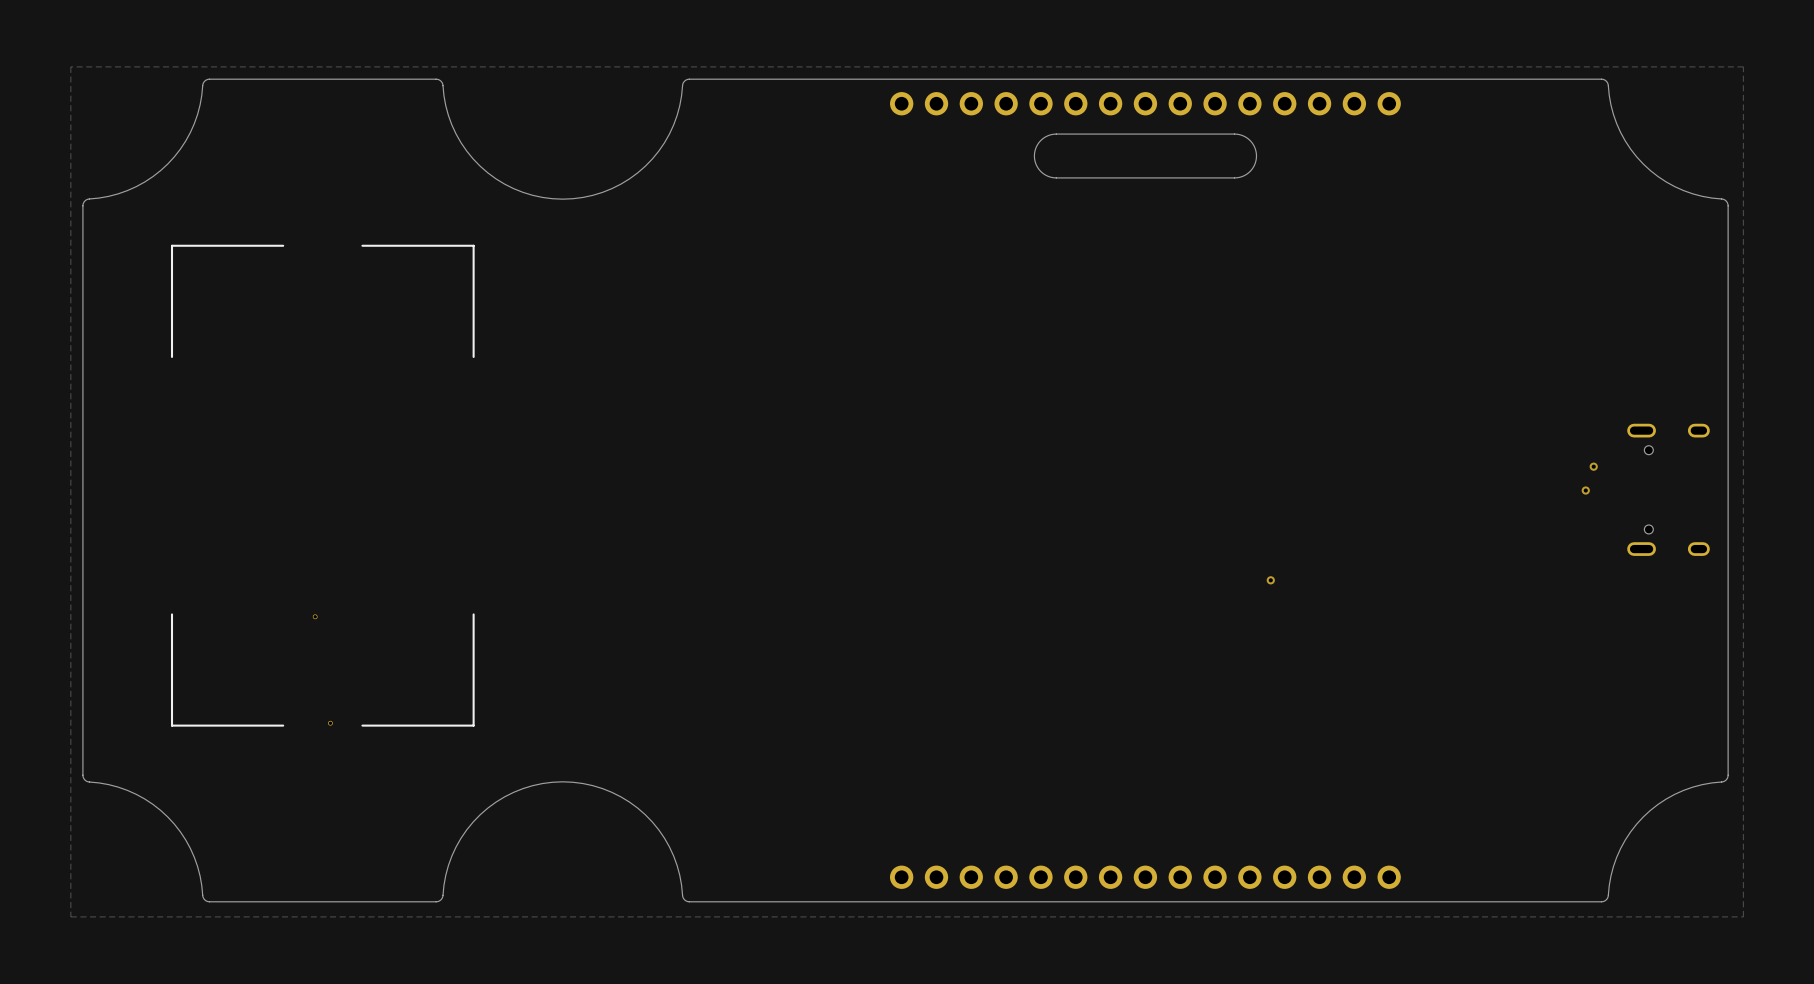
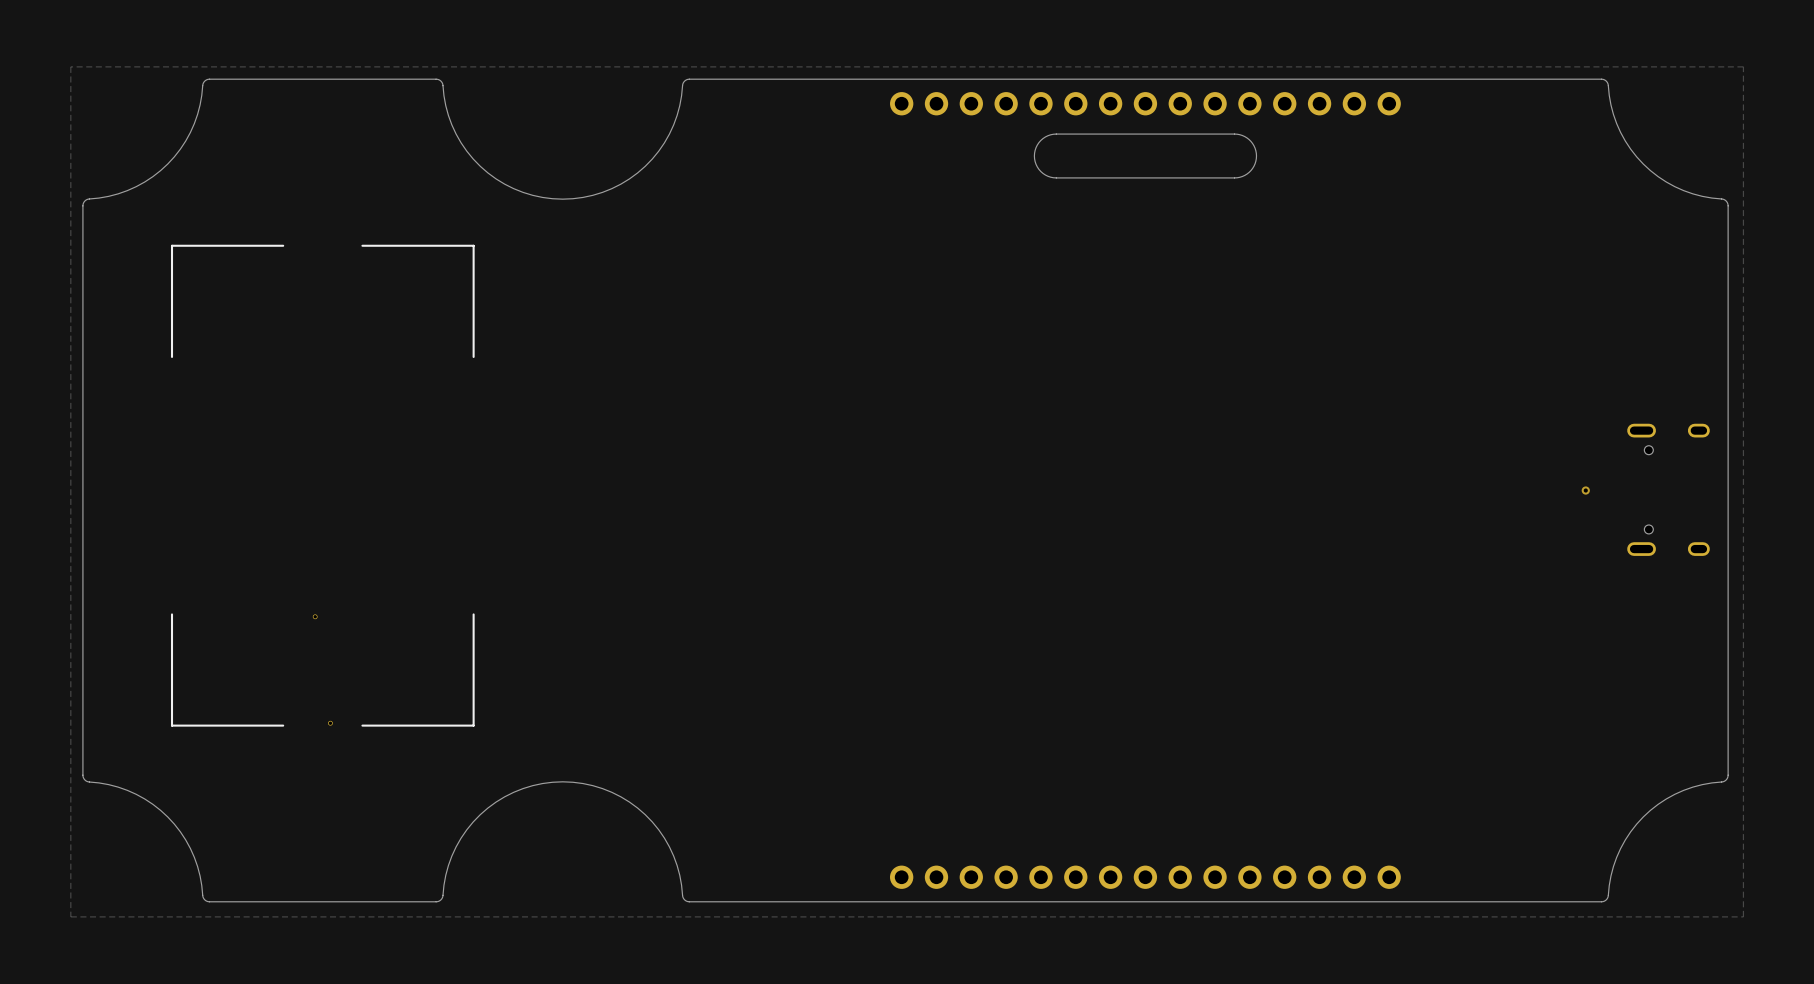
via: (1593, 466) -> none
via: (1270, 580) -> none

